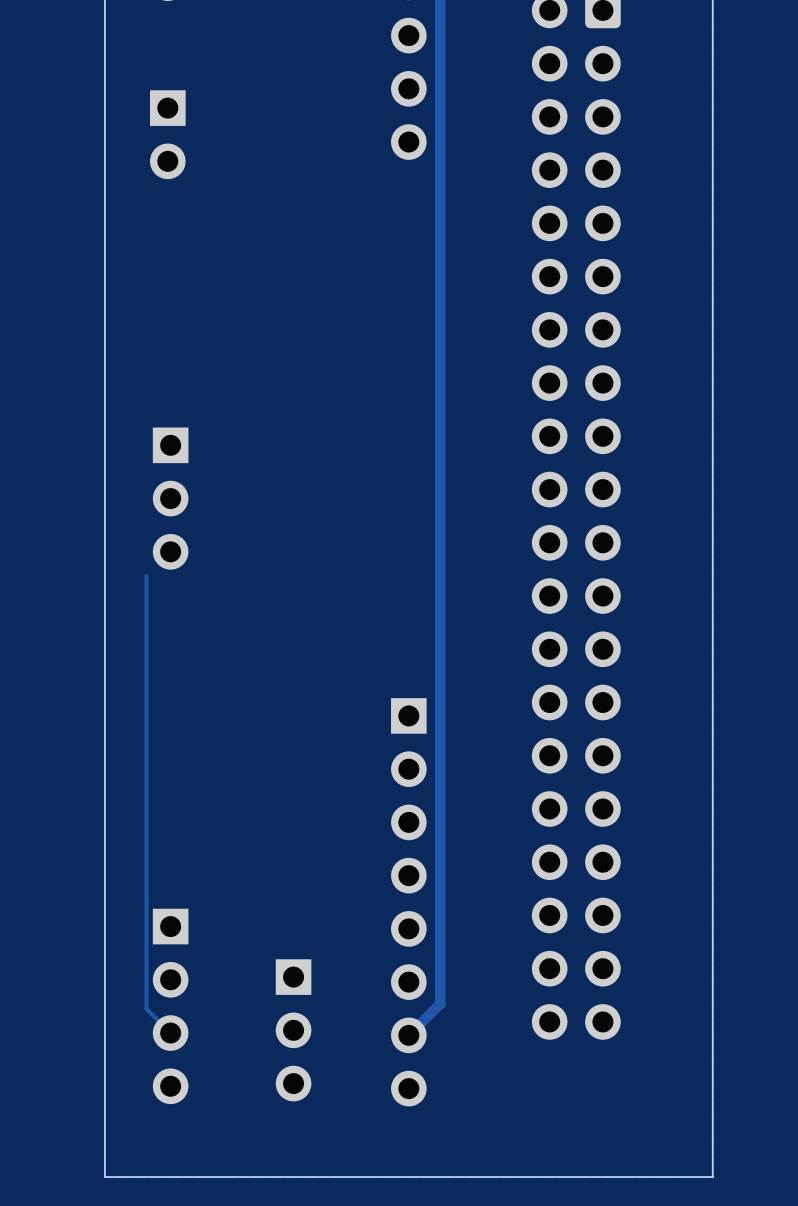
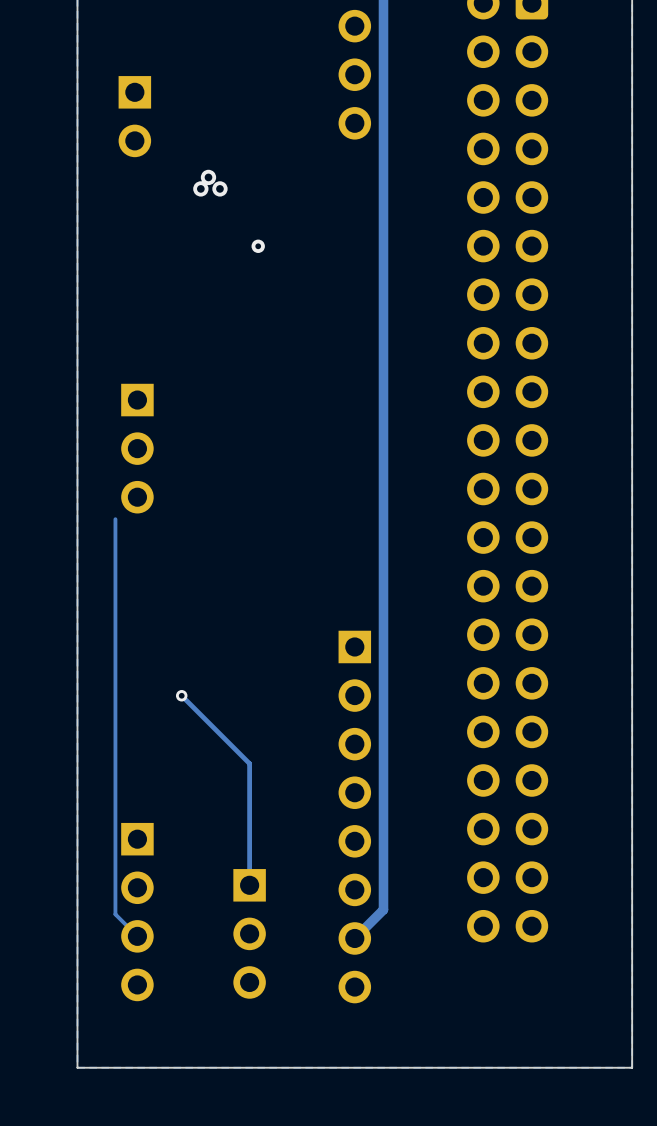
via: none -> (208, 177)
via: none -> (200, 188)
via: none -> (219, 188)
via: none -> (258, 246)
track: none -> (181, 695) (249, 763) (249, 885)
via: none -> (181, 695)

